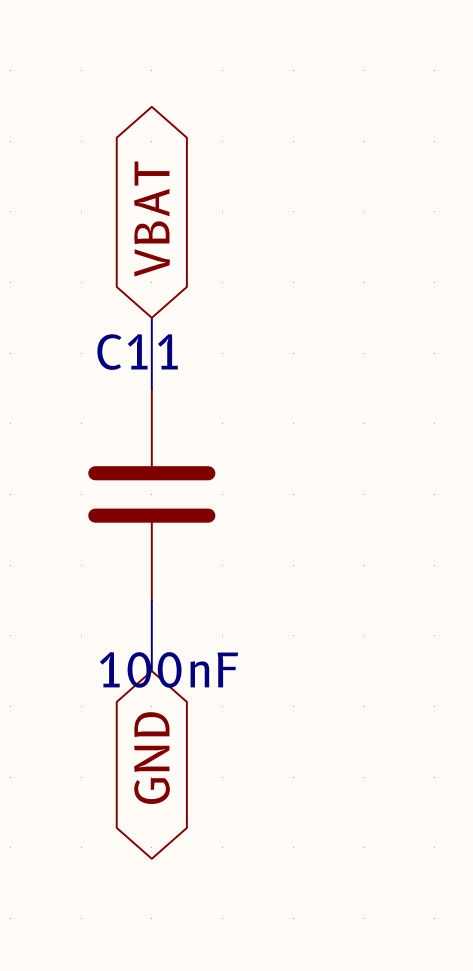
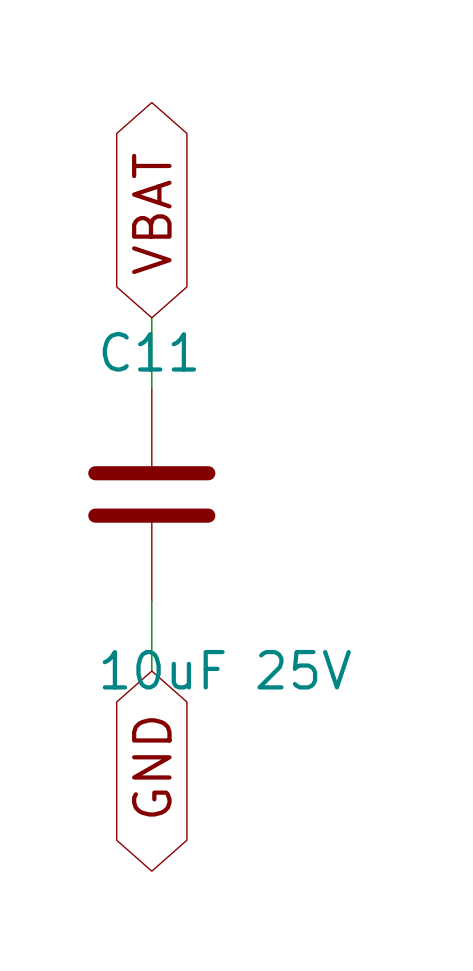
C11 value: 100nF (168, 669) -> 10uF 25V (226, 669)

